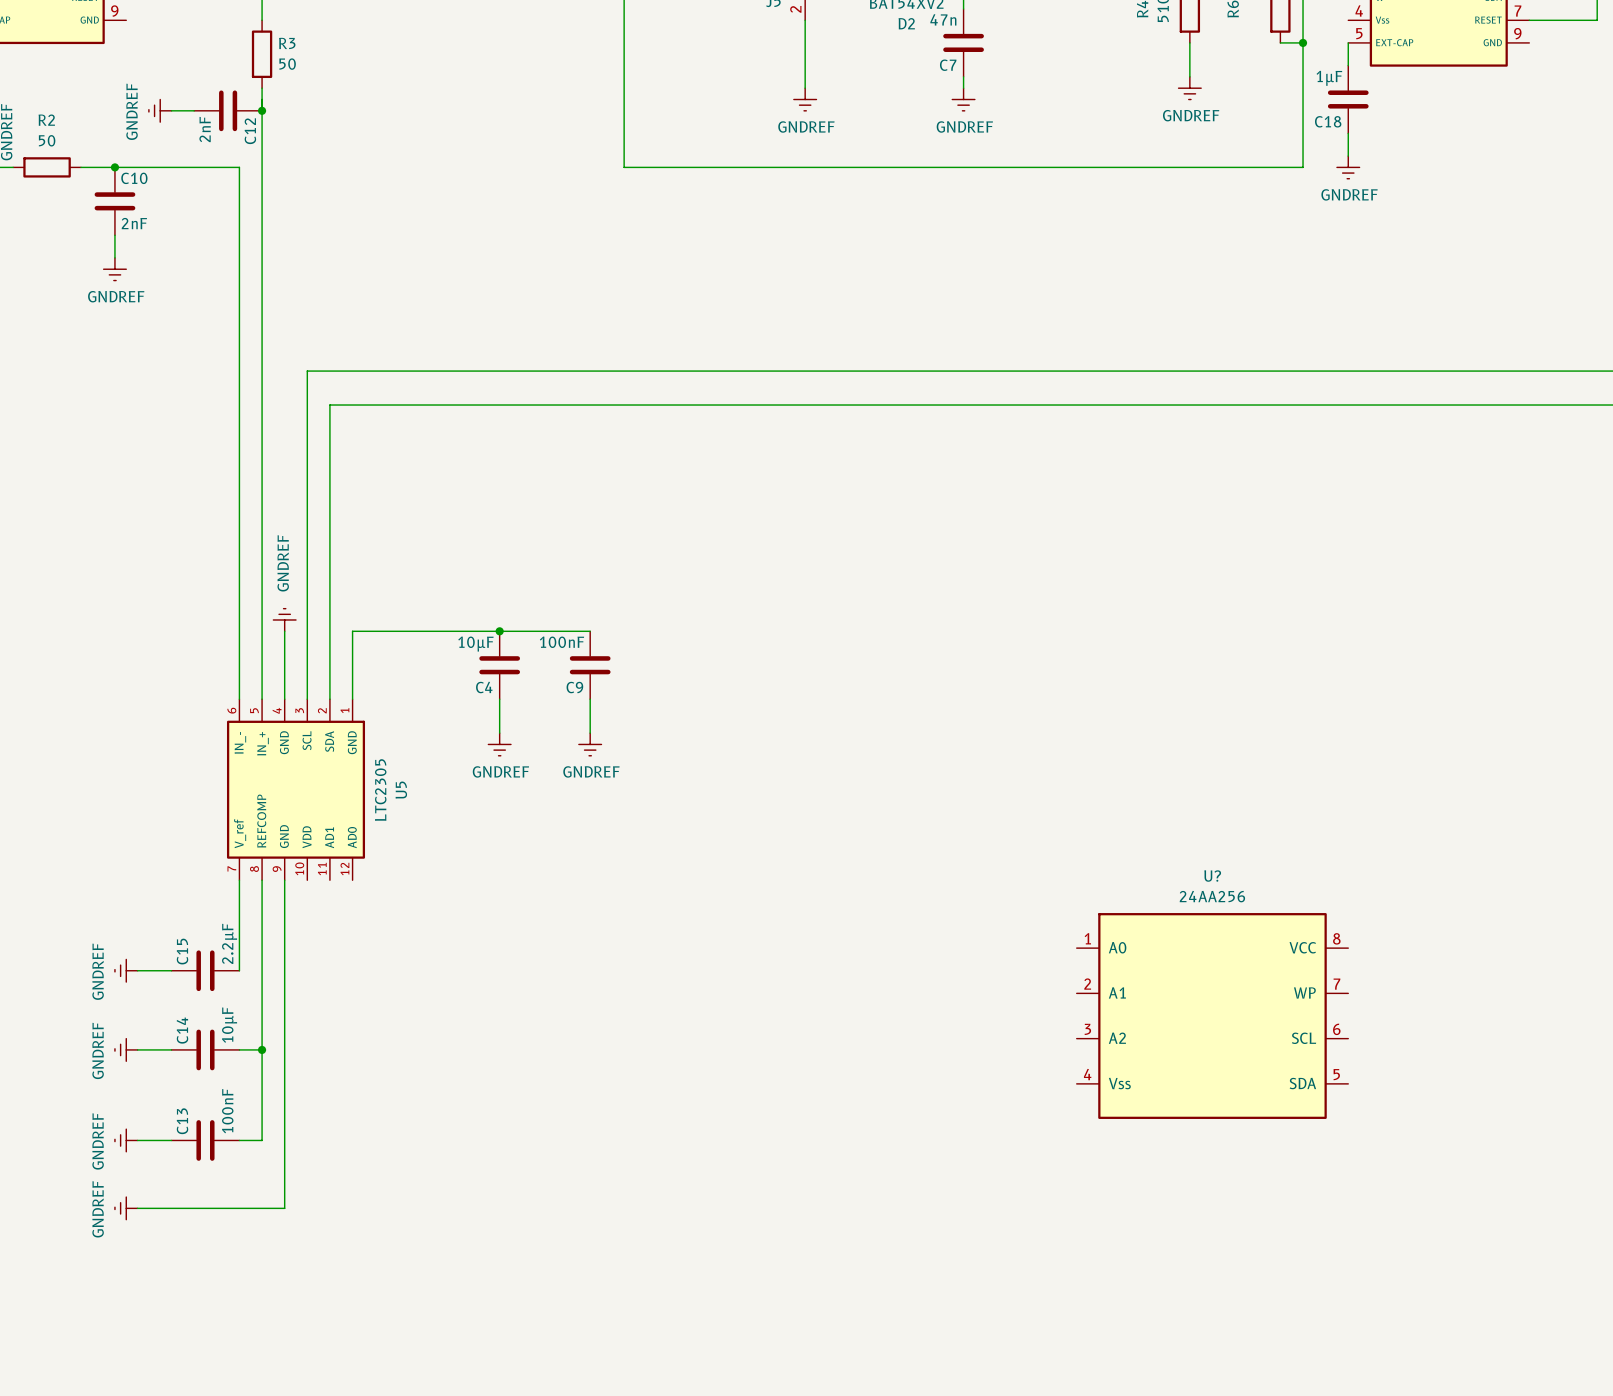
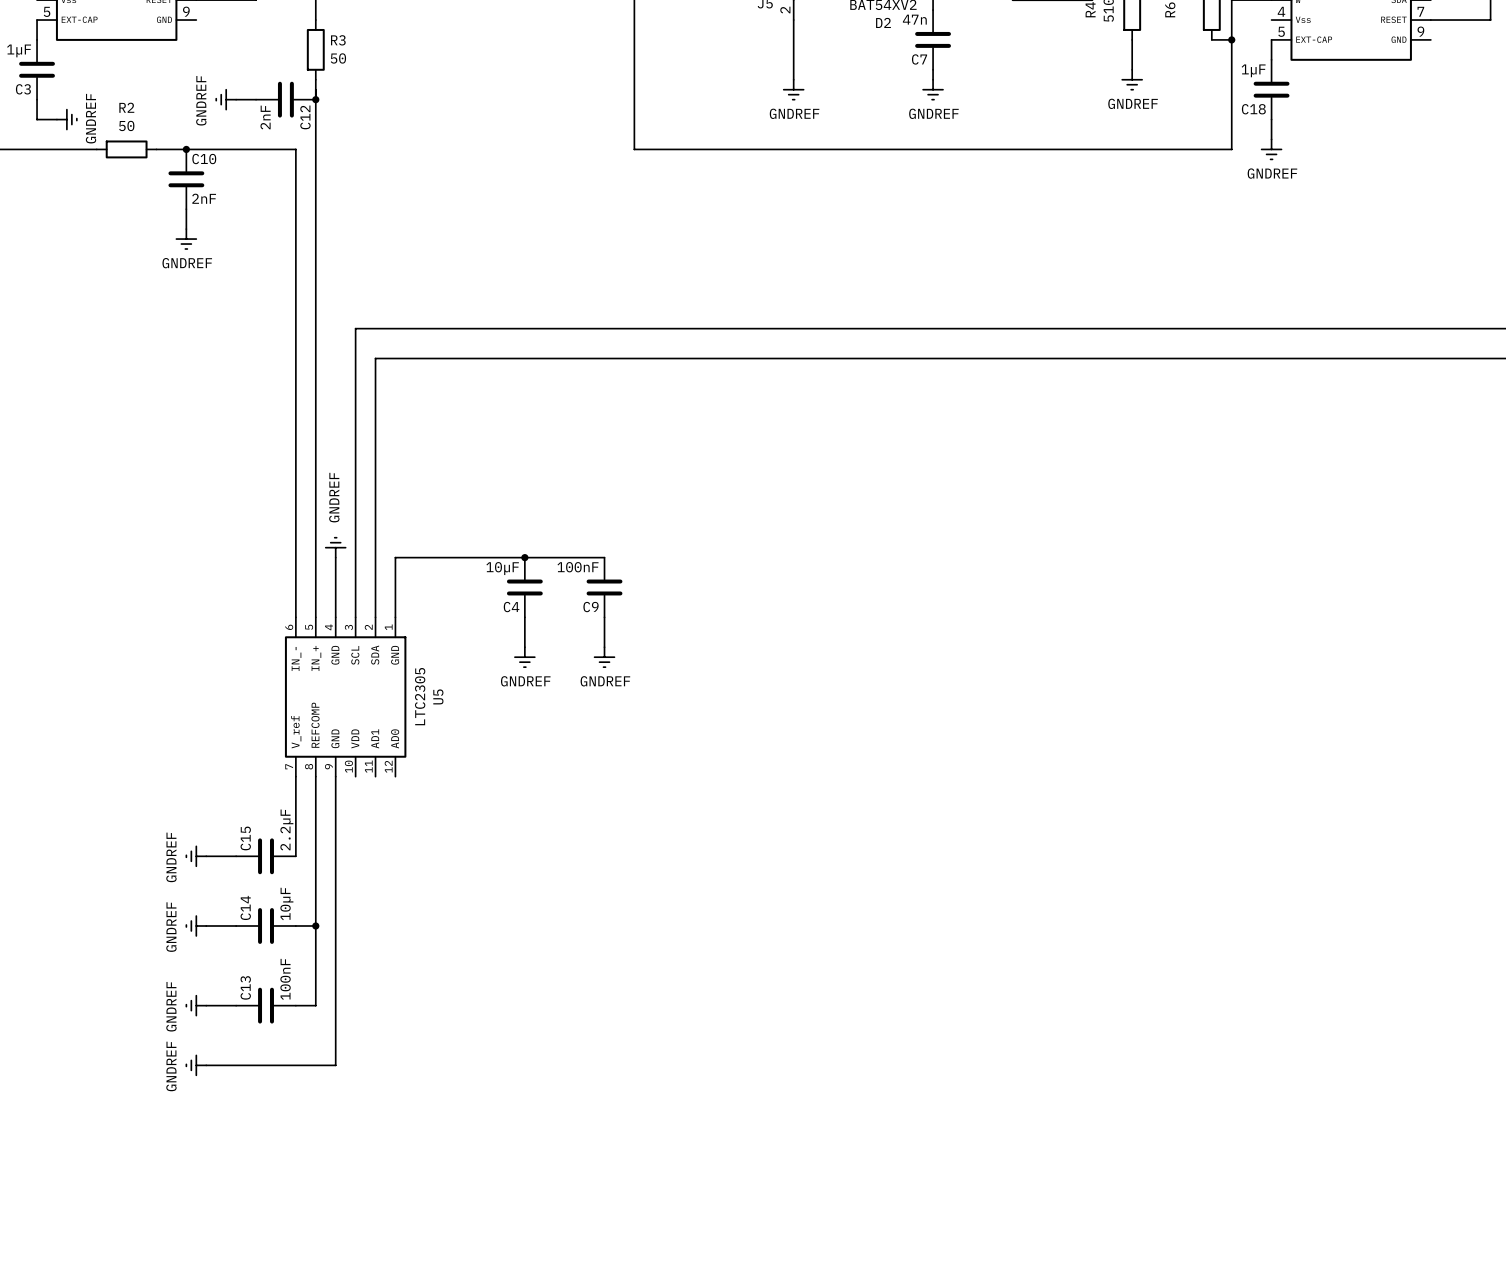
U?: 24AA256 (1212, 1016) -> none

